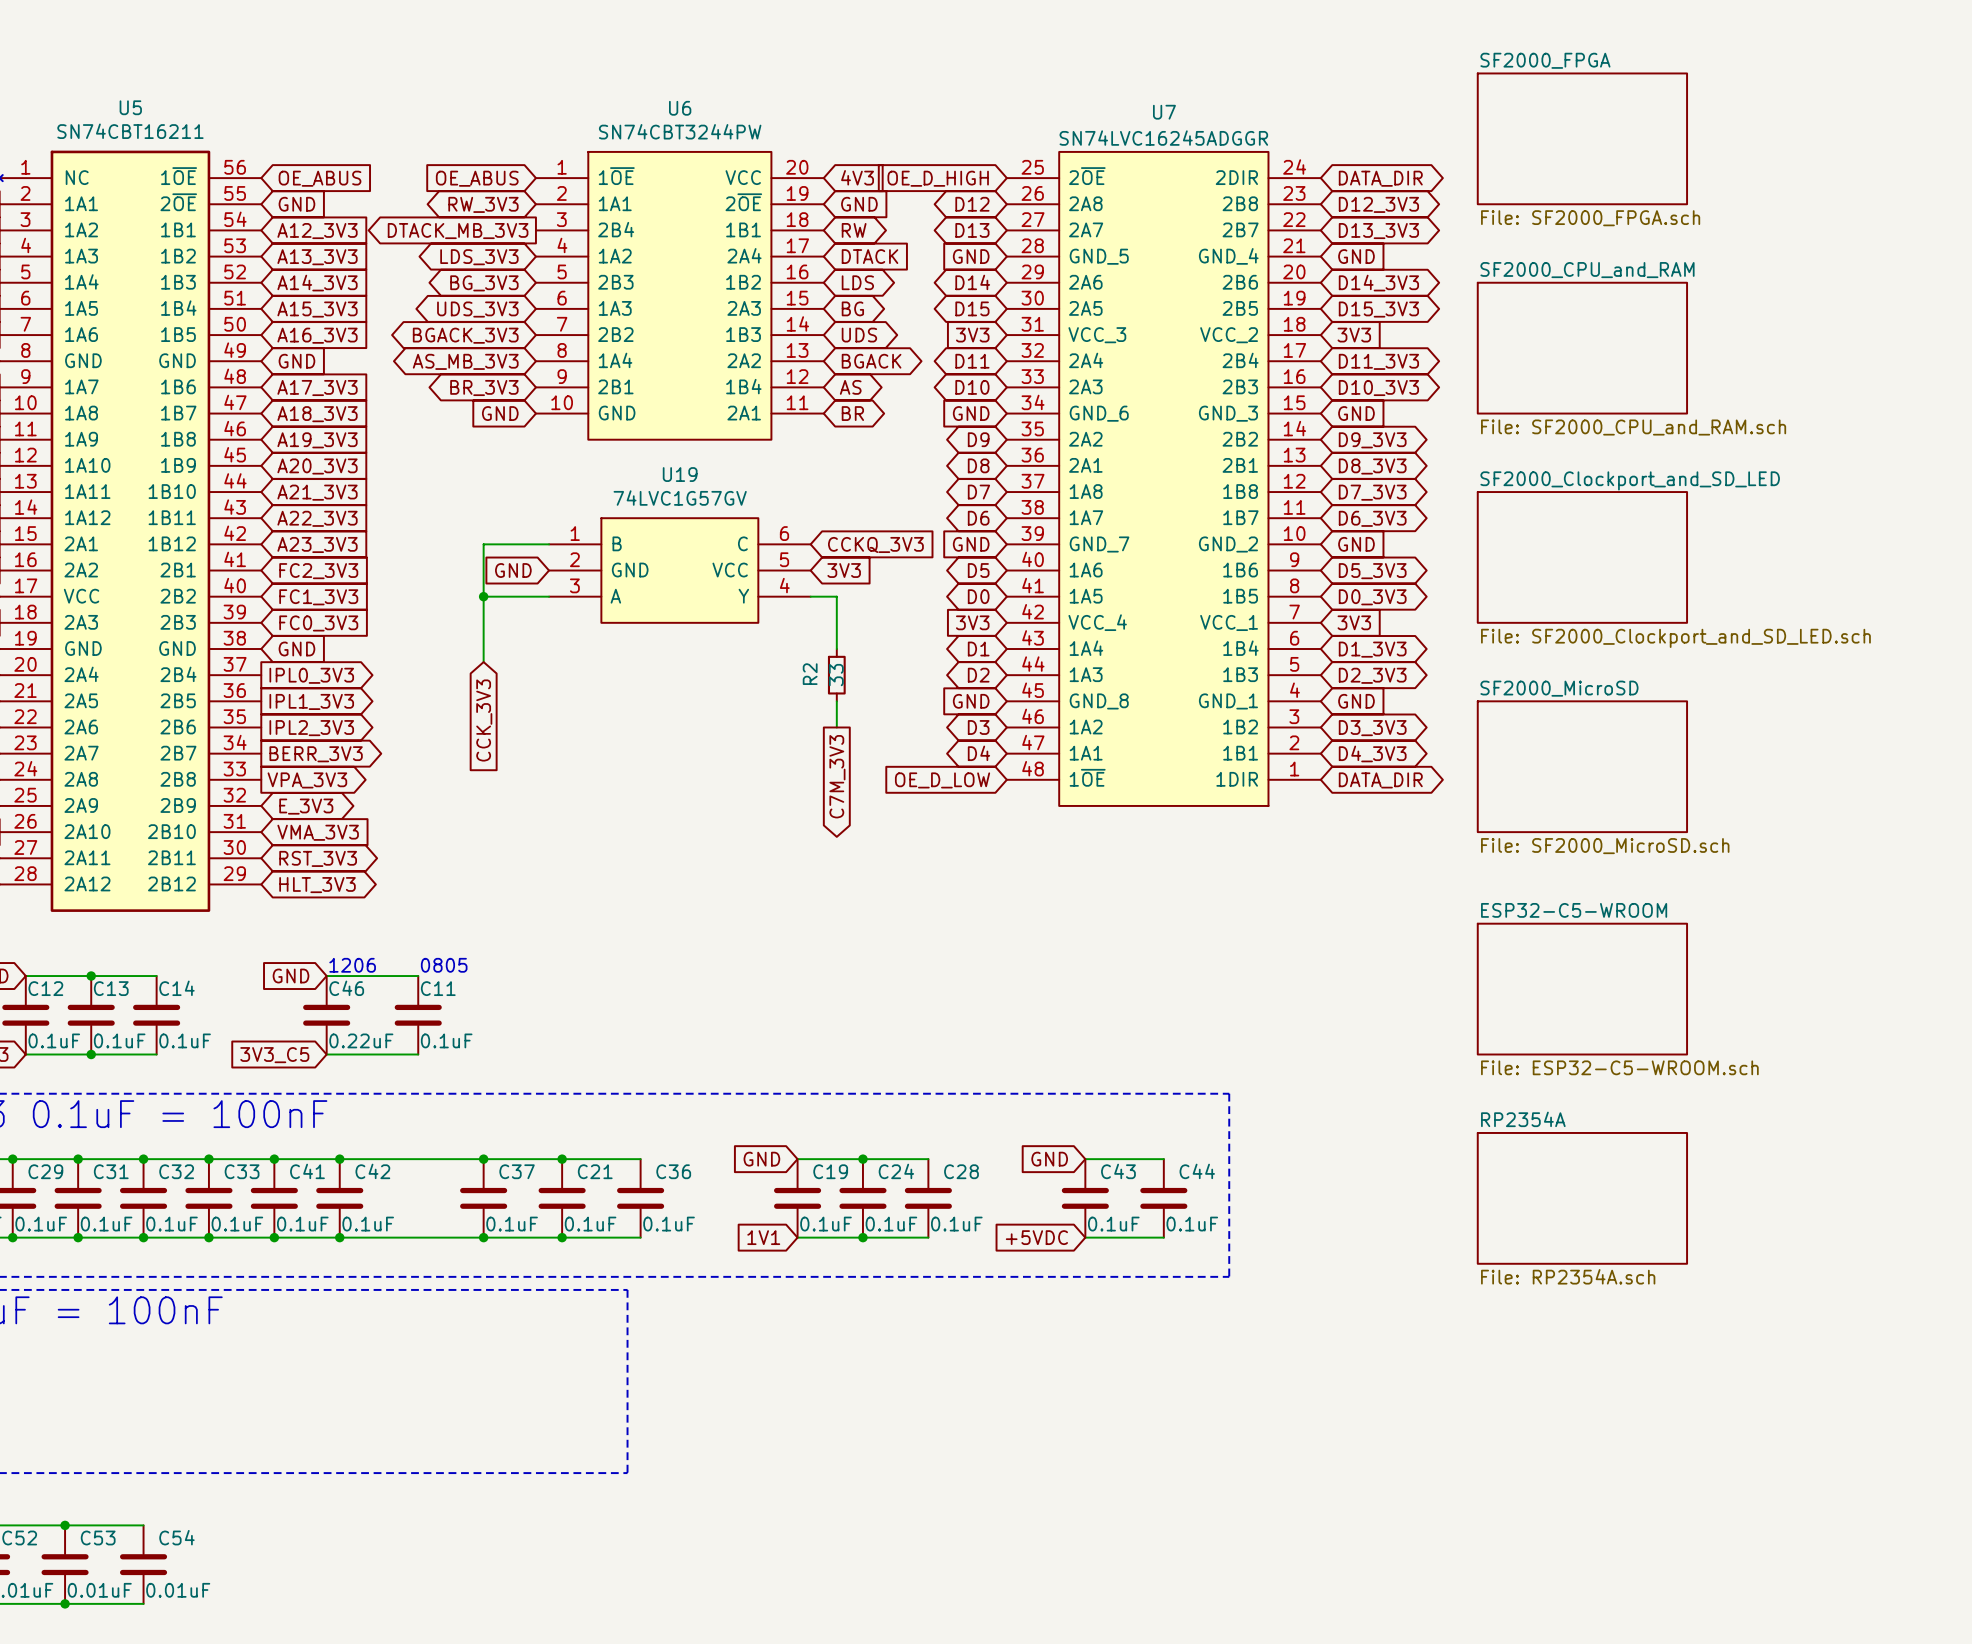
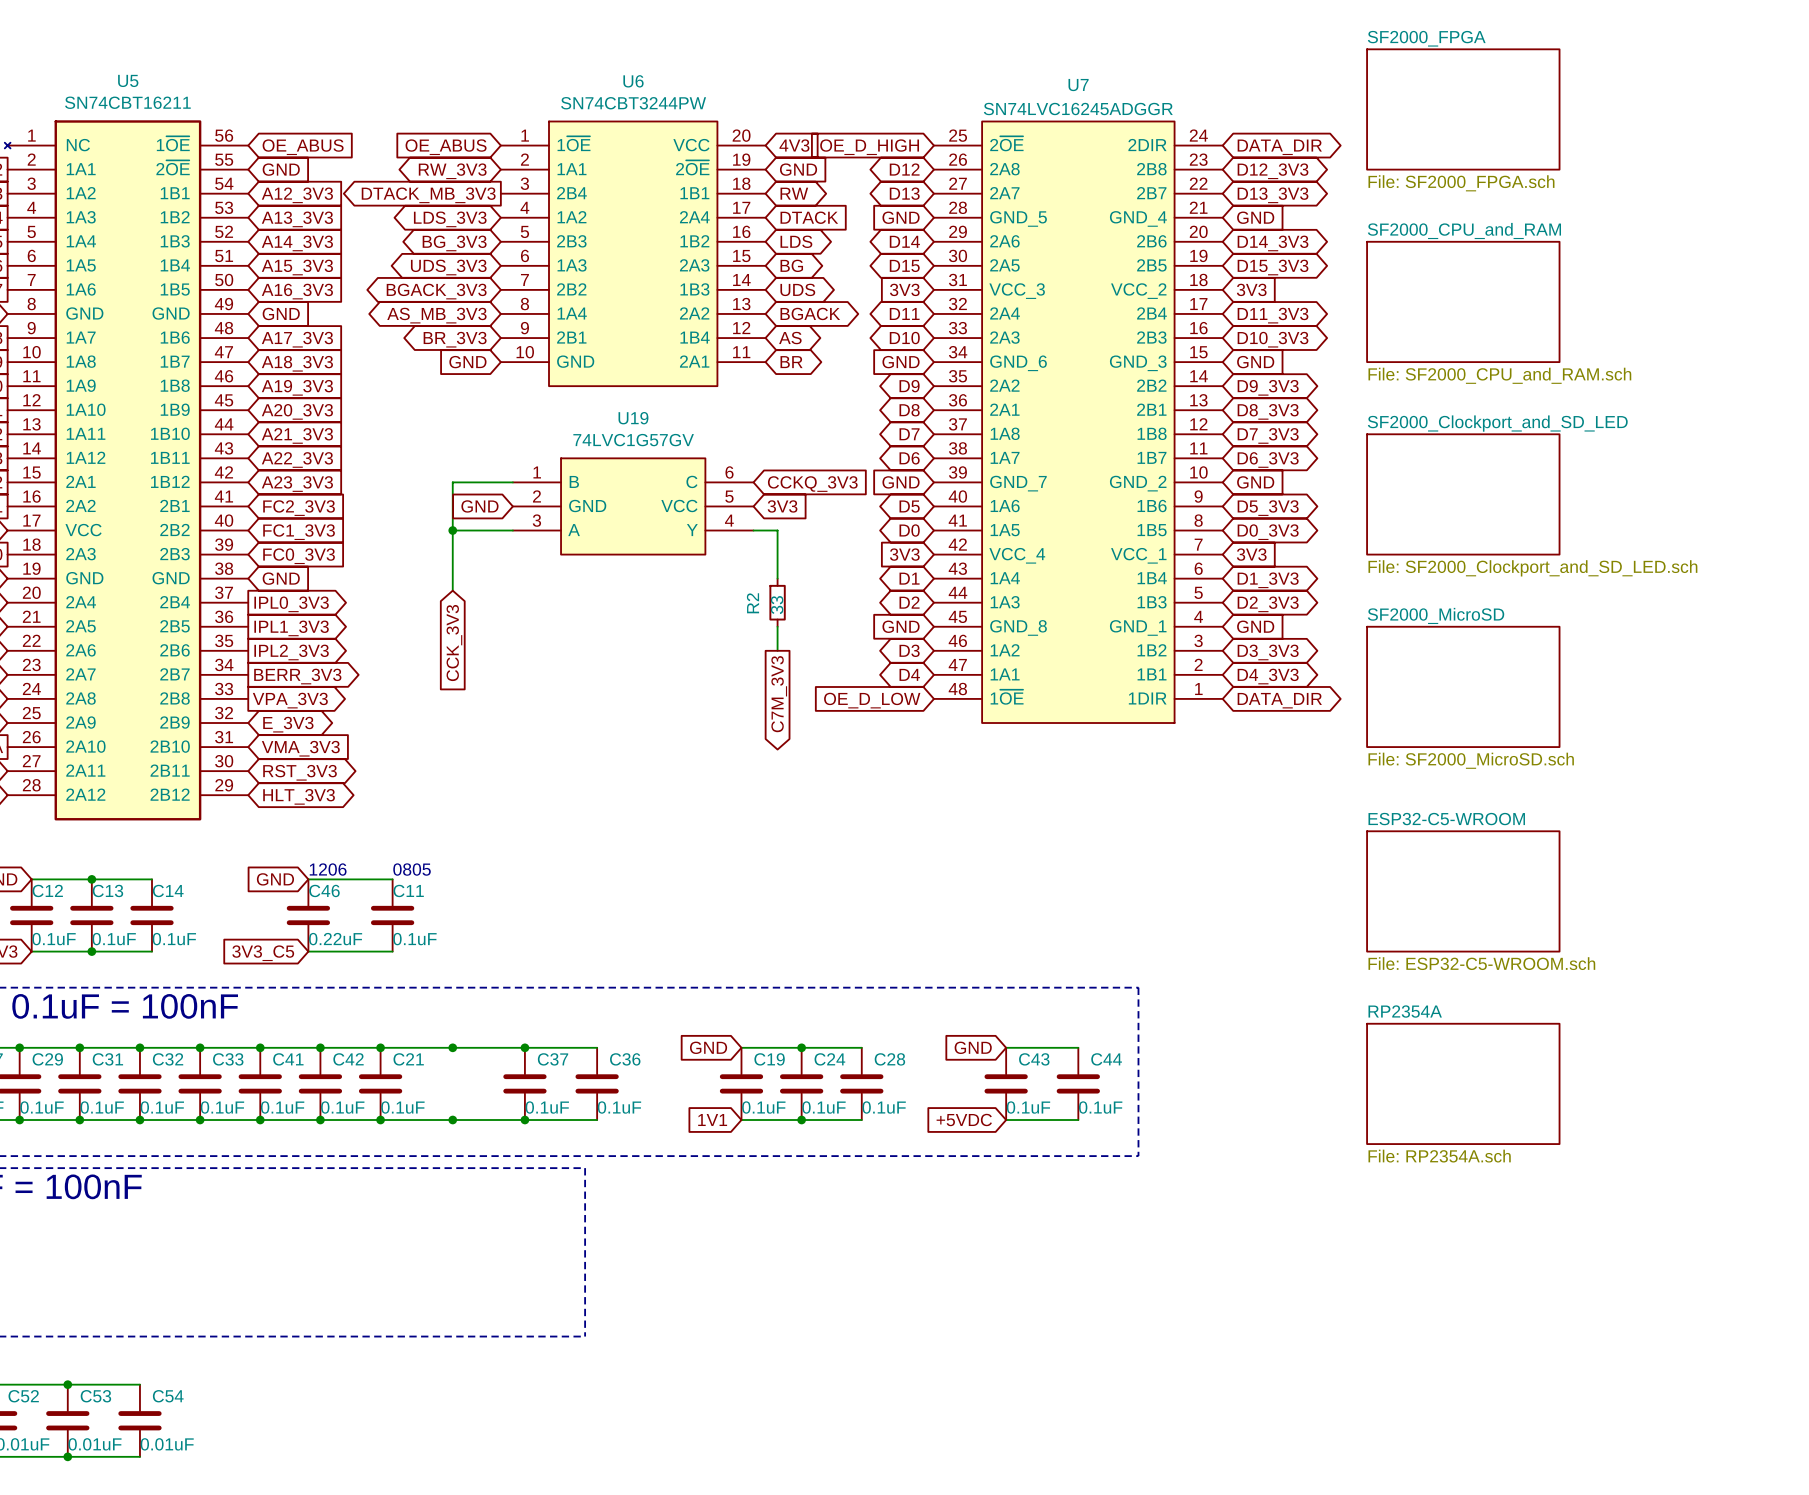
junction: none -> (380, 1047)
C21 name: C21 (595, 1171) -> C37 (553, 1059)
C21: none -> 0.1uF (380, 1083)
C37: 0.1uF (483, 1198) -> none
junction: none -> (380, 1120)

